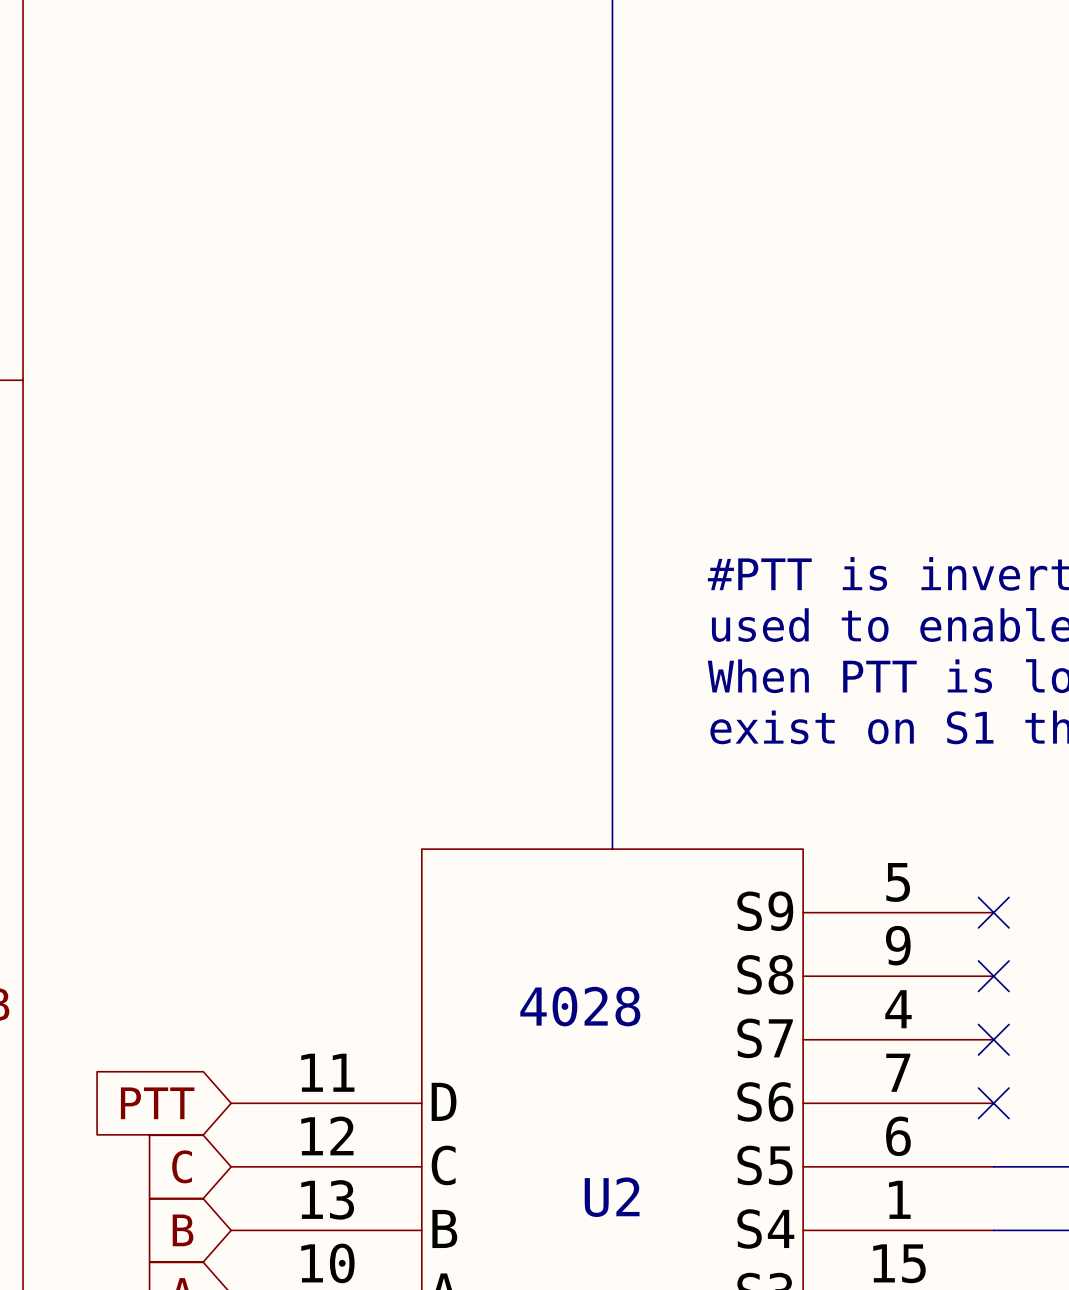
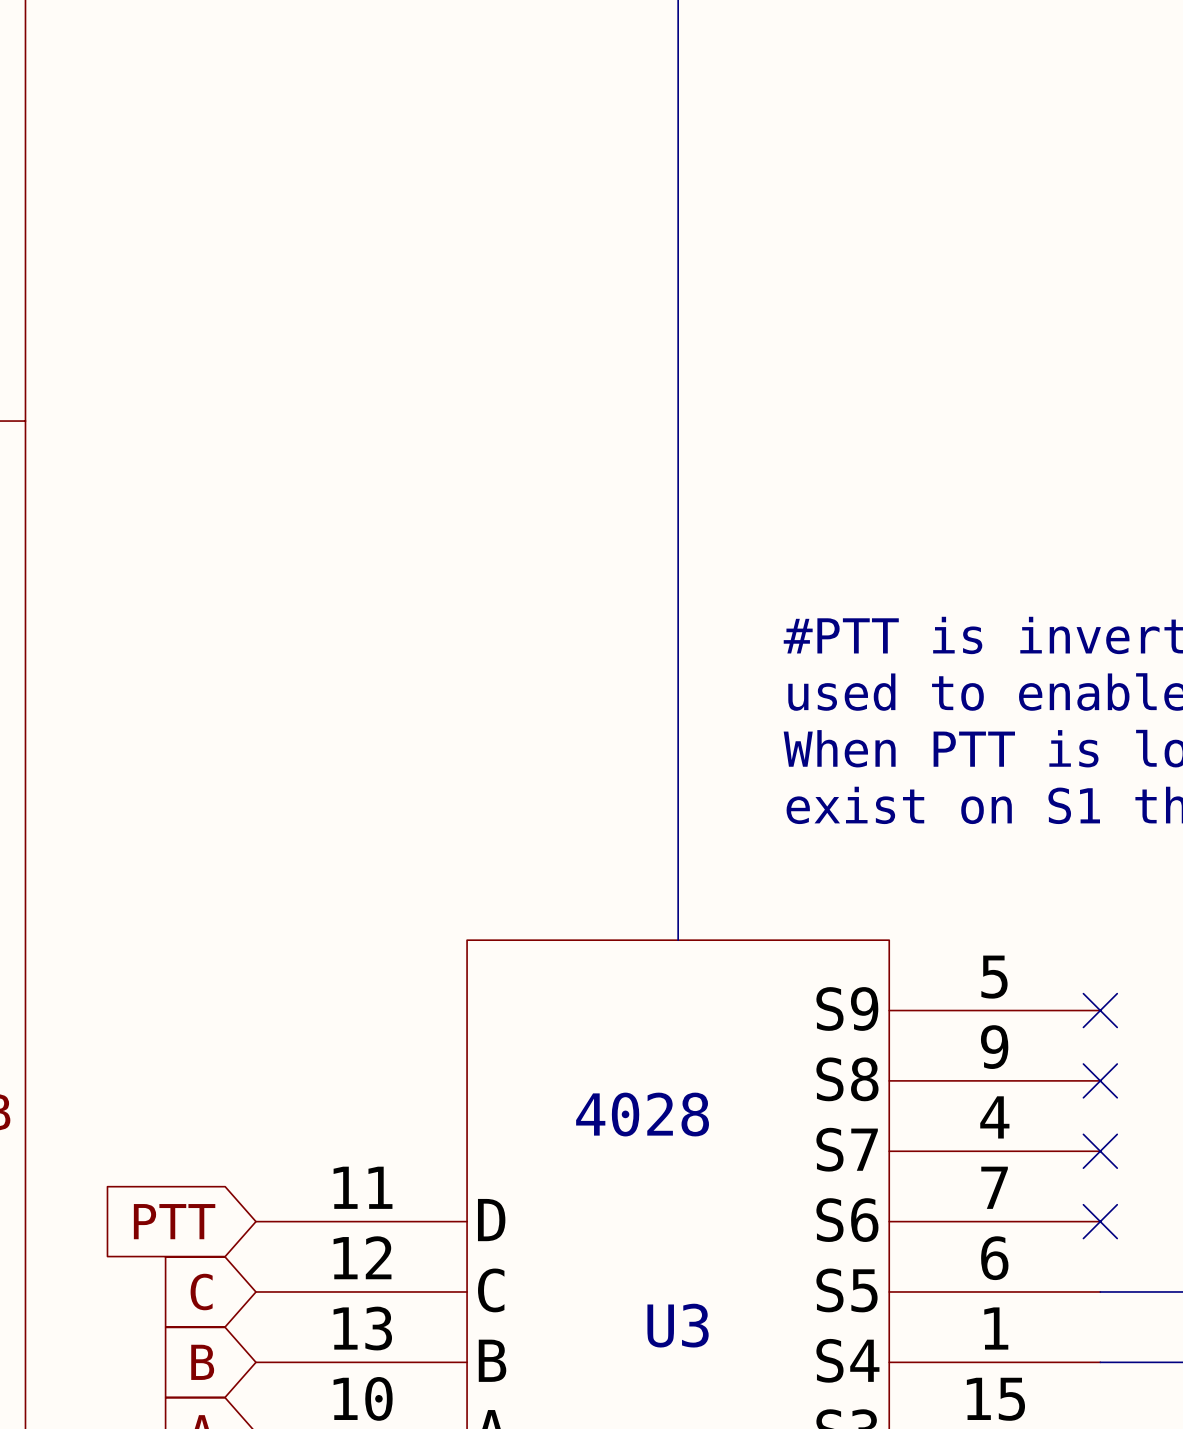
U2 name: U2 (612, 1197) -> U3 (678, 1325)

